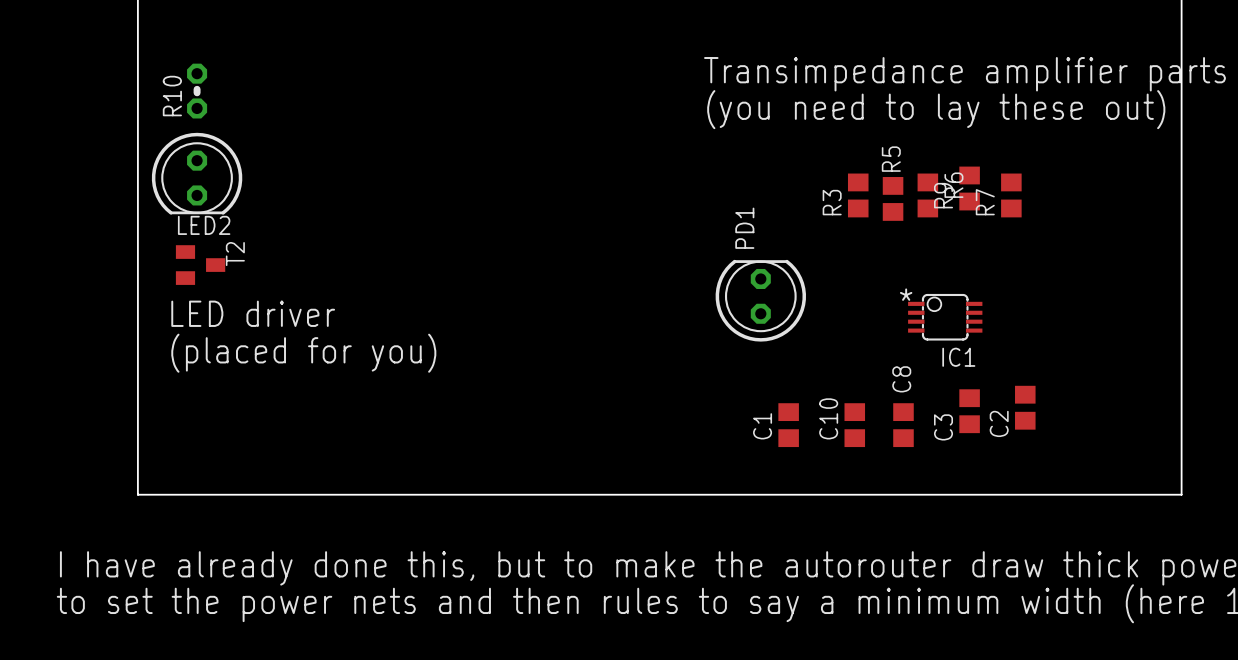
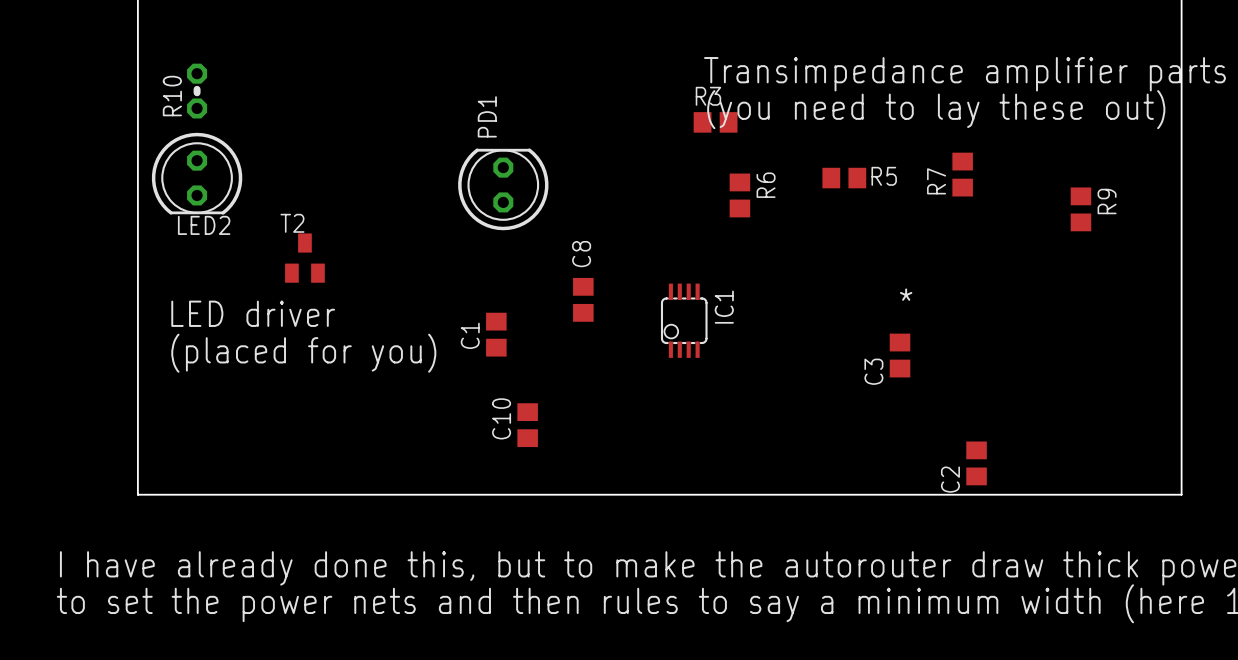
R9 position: (969, 188) -> (1080, 209)
R3 rotation: 0° (858, 195) -> 90° clockwise (715, 122)
R3 position: (858, 195) -> (715, 122)
R6 position: (927, 195) -> (739, 195)
R9 name position: R9 (943, 195) -> R9 (1107, 201)
R7 position: (1011, 195) -> (962, 174)
R5 rotation: 0° (893, 198) -> 90° clockwise (844, 178)
R5 position: (893, 198) -> (844, 178)
T2 rotation: 0° (200, 265) -> 90° counterclockwise (304, 258)
T2 position: (200, 265) -> (304, 258)
PD1 position: (760, 300) -> (503, 189)
IC1 rotation: 0° (945, 317) -> 90° counterclockwise (684, 320)
IC1 position: (945, 317) -> (684, 320)
C2 position: (1025, 407) -> (976, 463)
C3 position: (969, 411) -> (900, 355)
C1 position: (788, 425) -> (496, 334)
C10 position: (854, 425) -> (527, 425)
C8 position: (903, 425) -> (583, 299)

